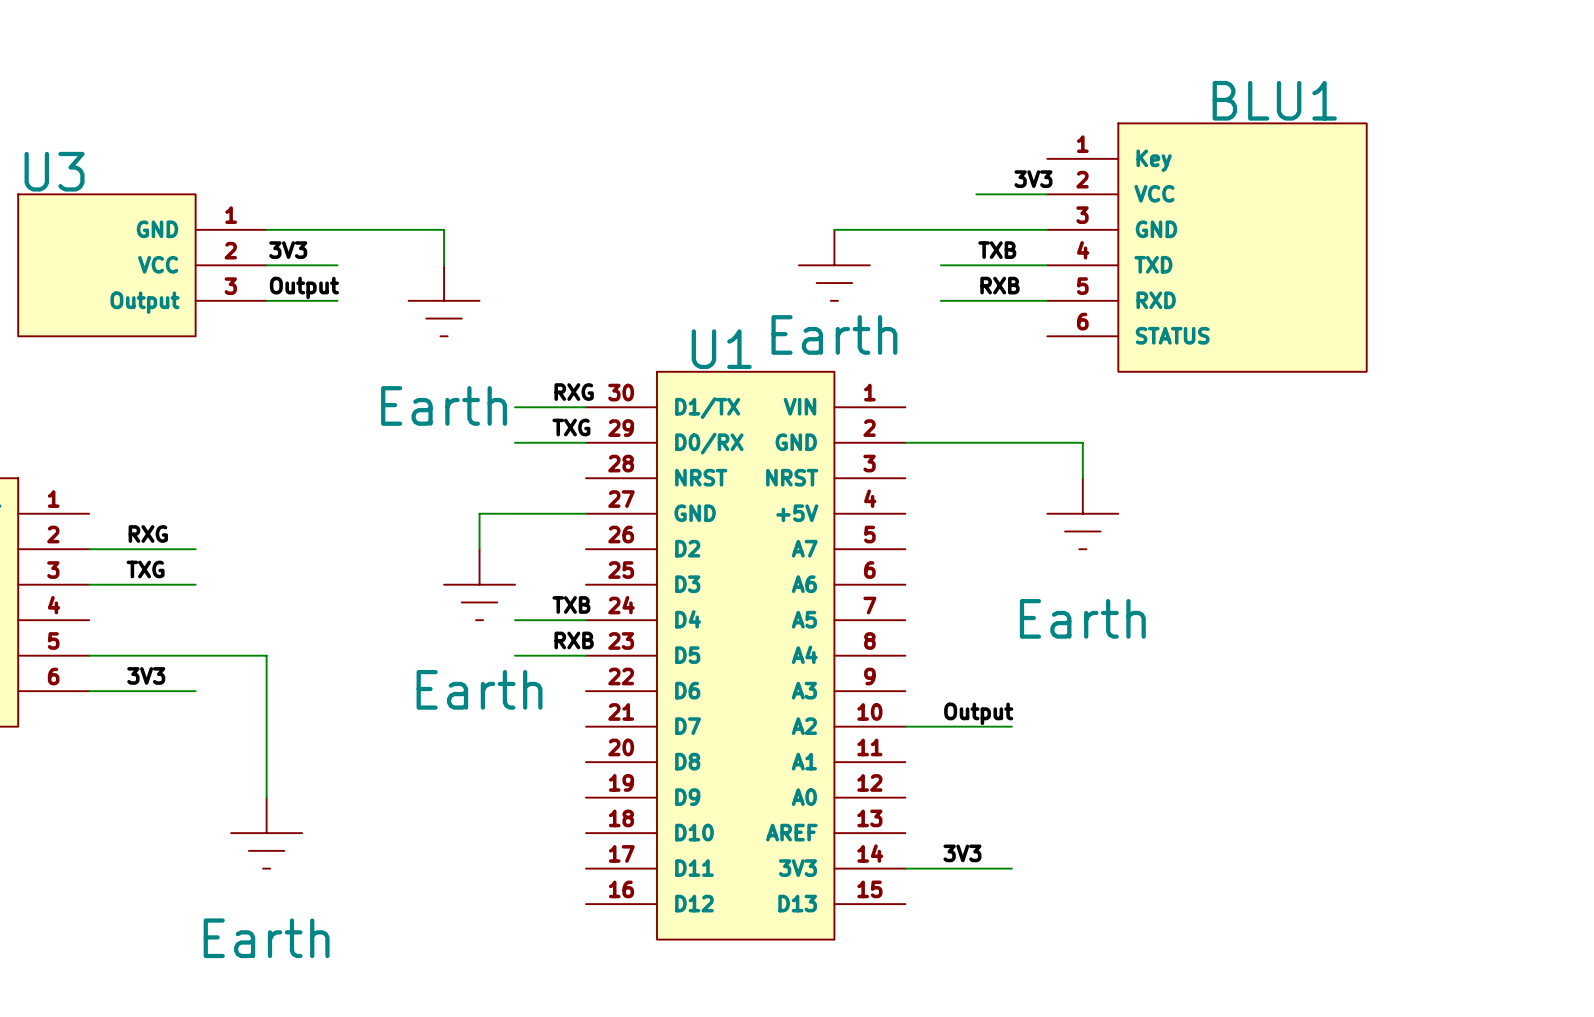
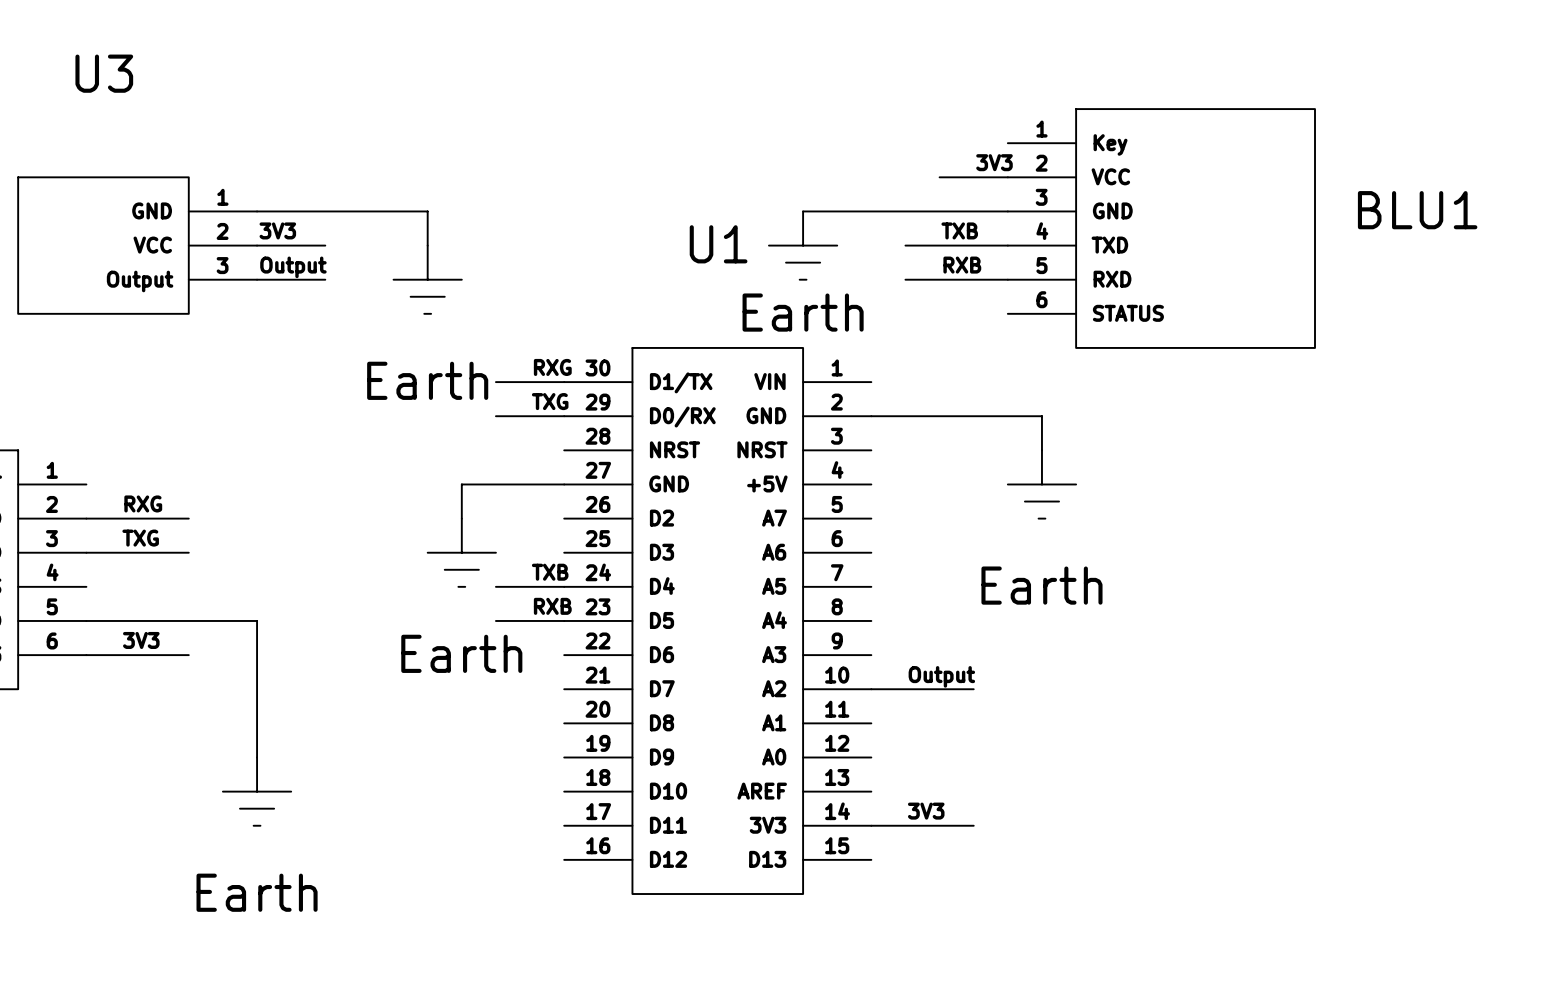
BLU1 name position: BLU1 (1274, 100) -> BLU1 (1417, 210)
U3 name position: U3 (54, 171) -> U3 (104, 73)
U1 name position: U1 (721, 349) -> U1 (718, 244)

